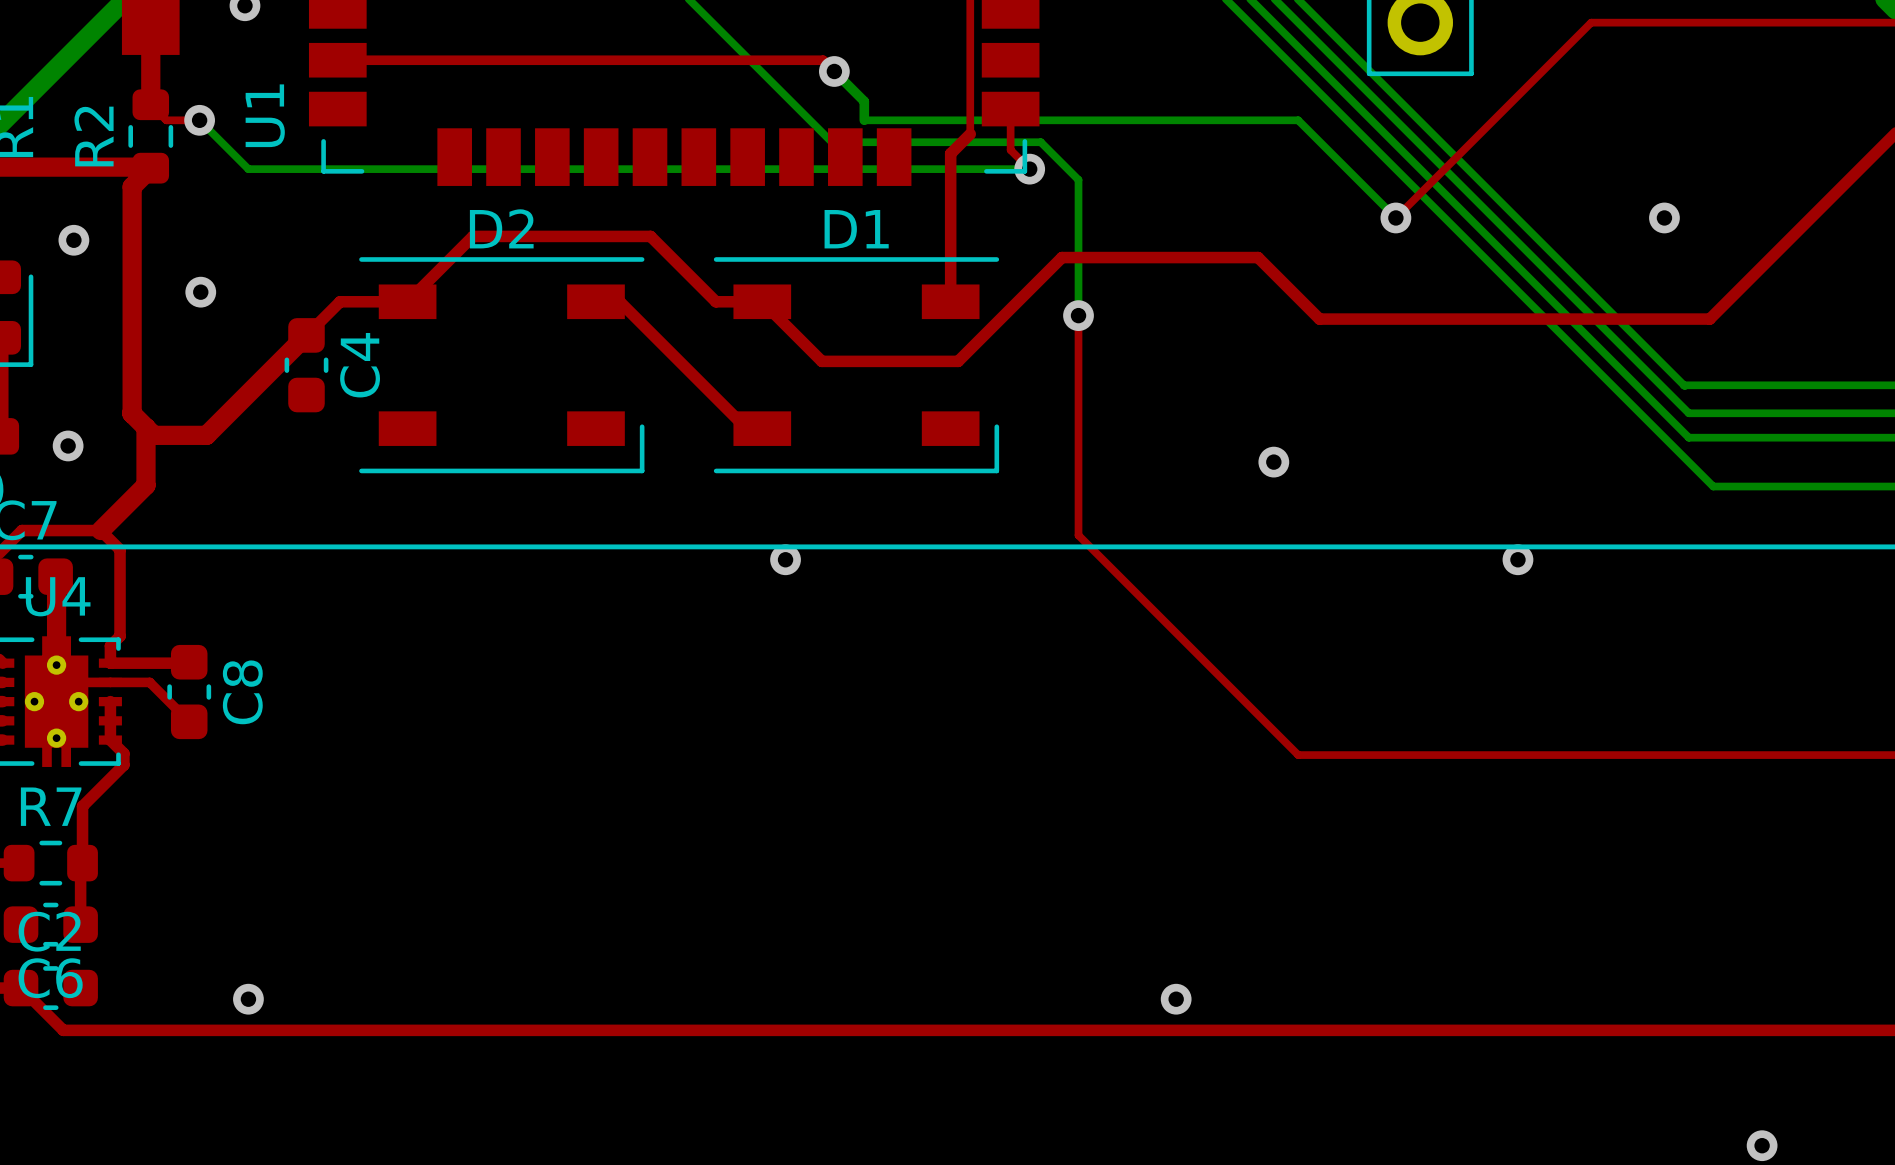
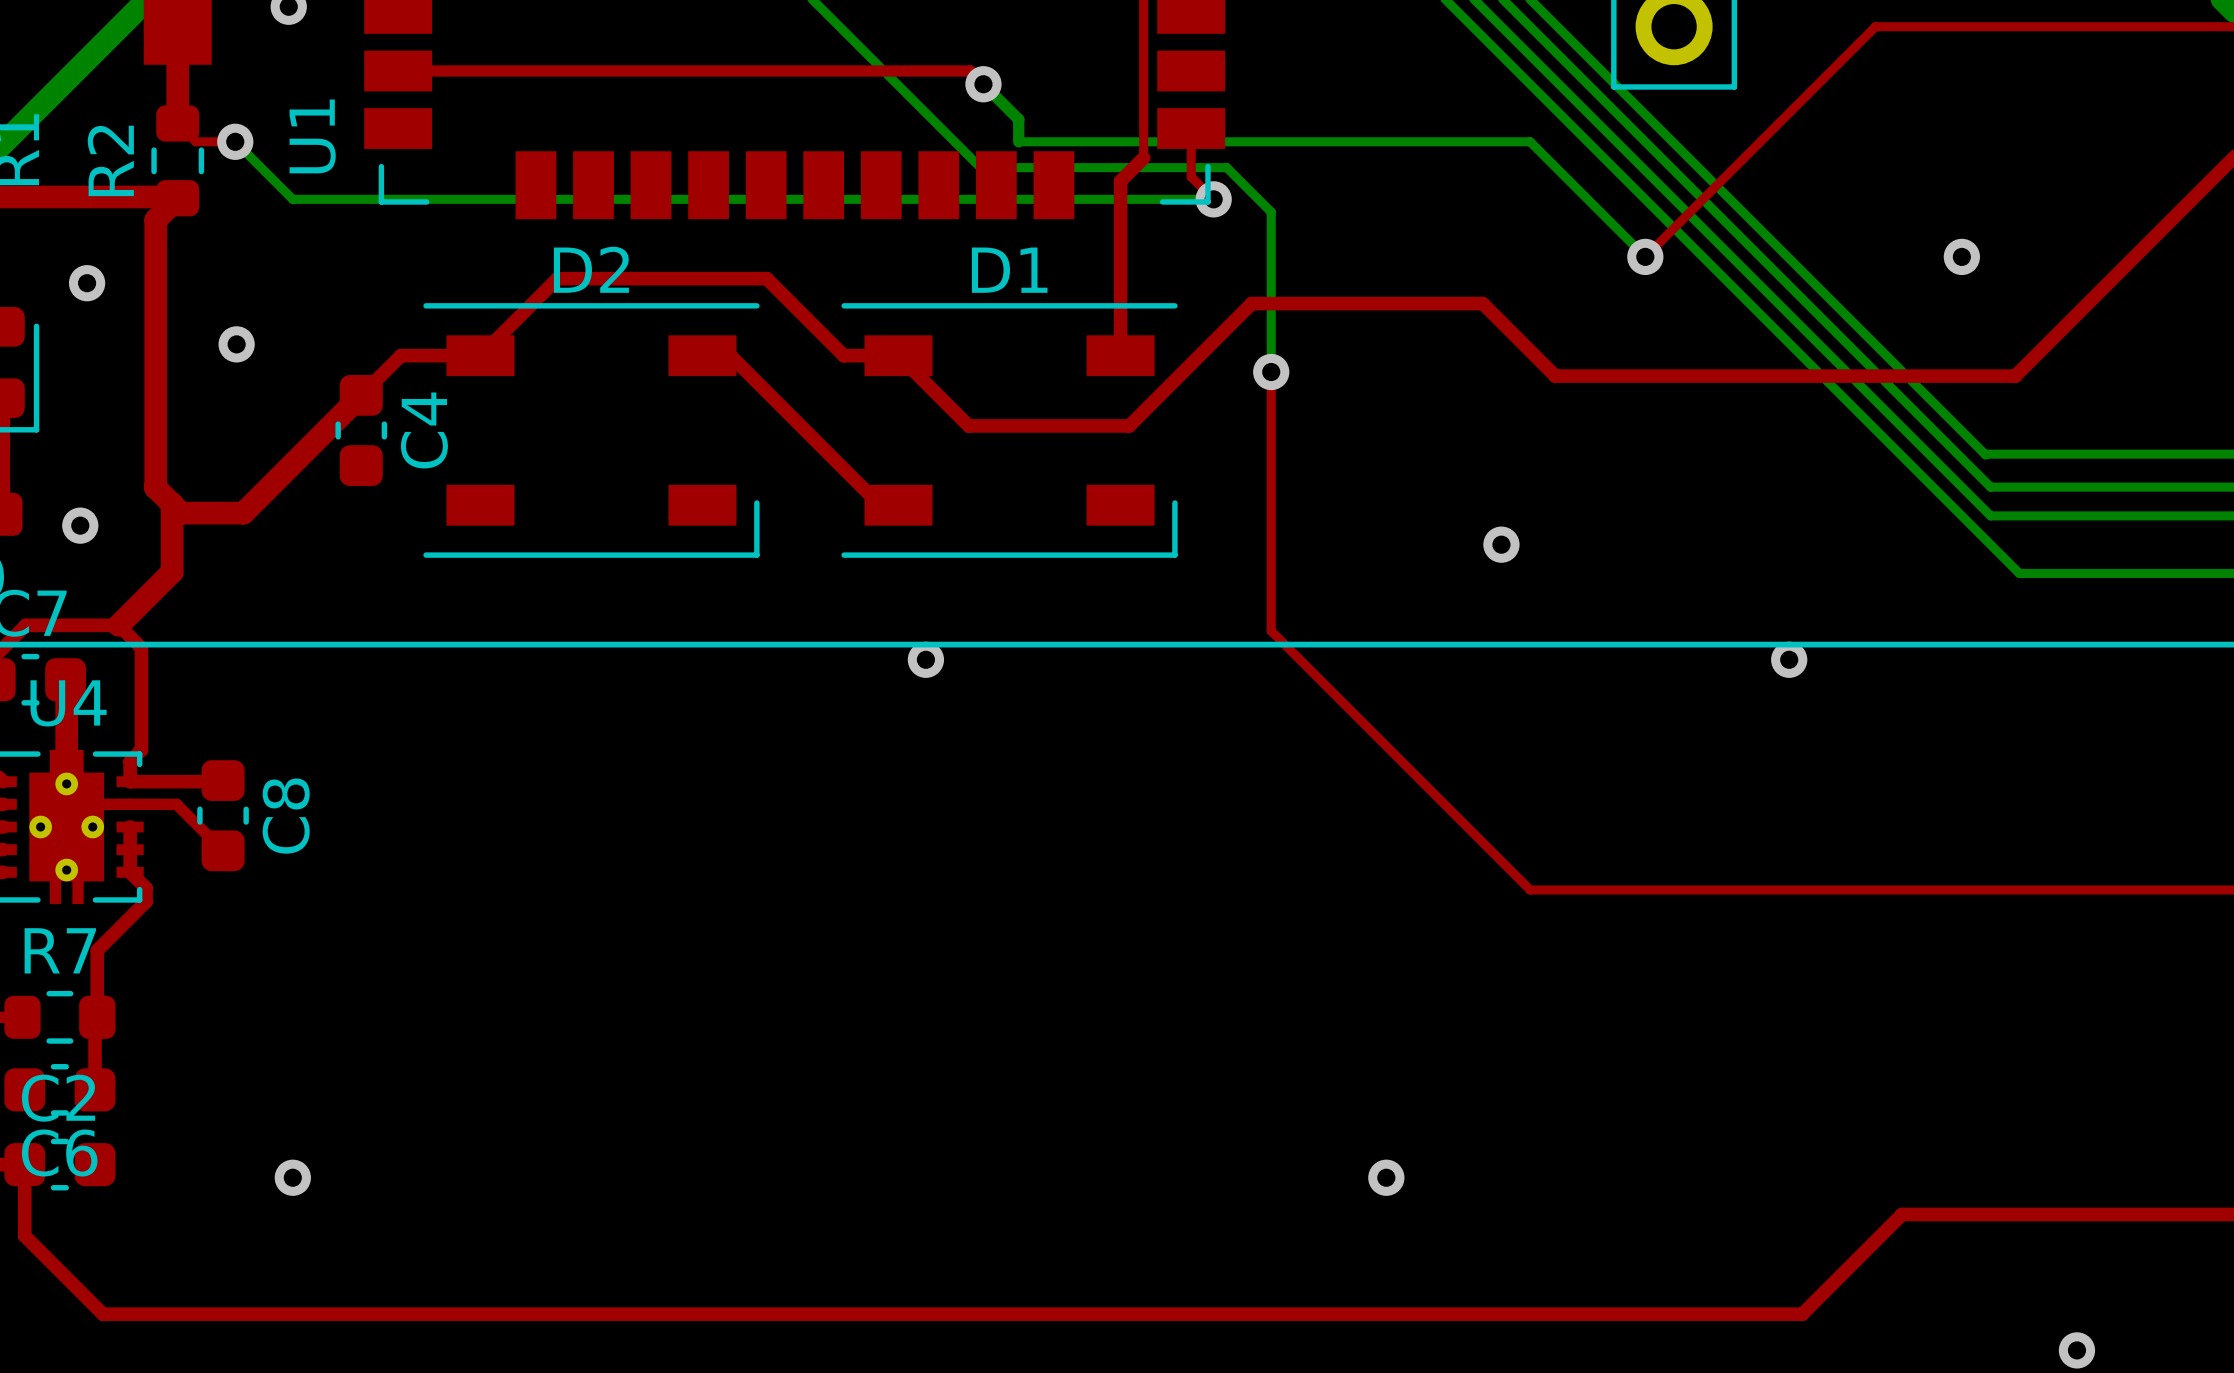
top track: (21, 988) (63, 1030) (1613, 1030) -> (24, 1164) (24, 1235) (102, 1314) (1802, 1314) (1902, 1214)

